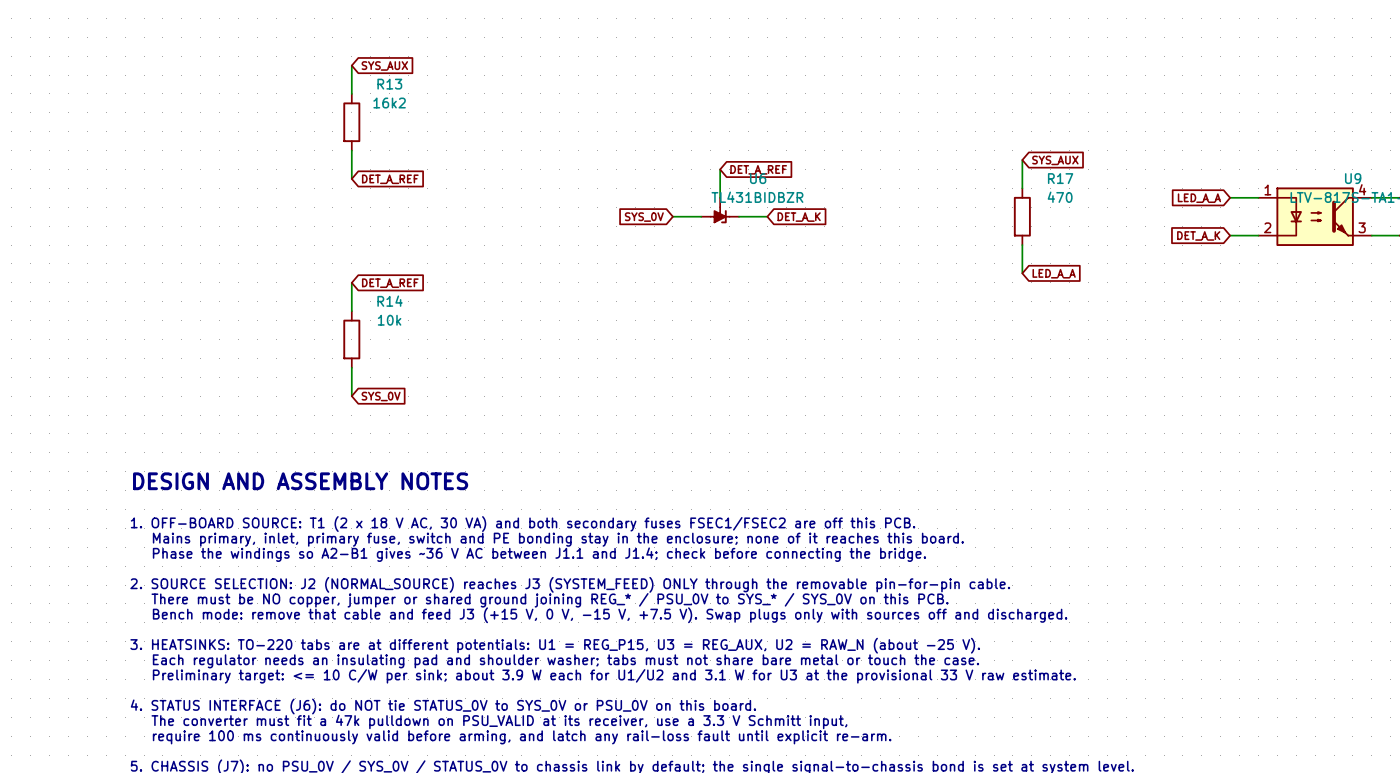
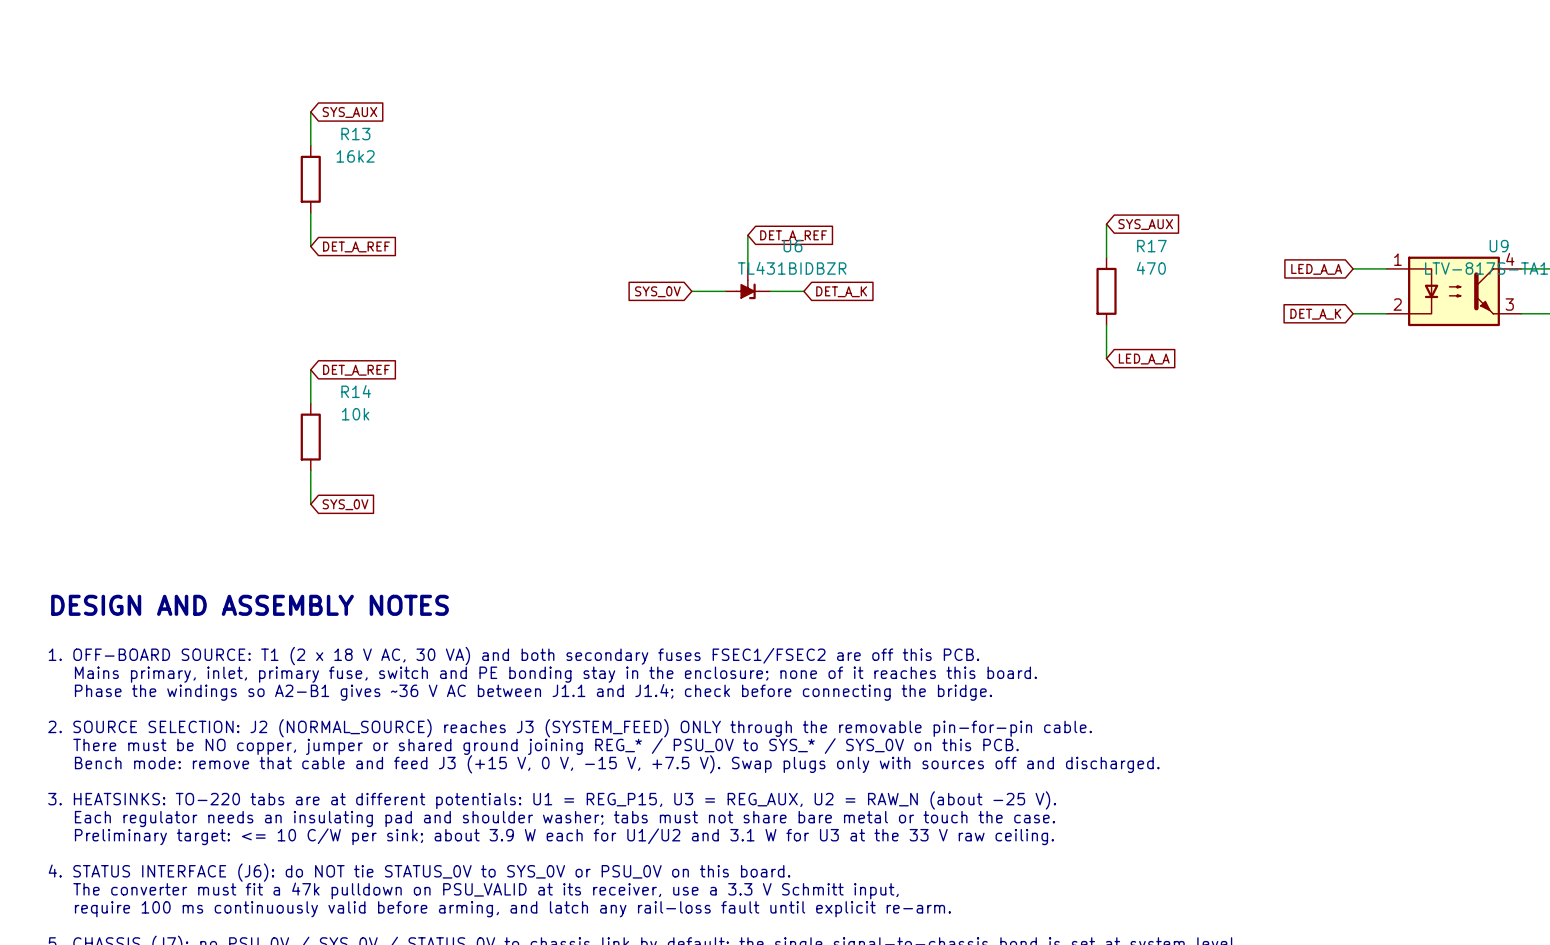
text: Preliminary target: <= 10 C/W per sink; about 3.9 W each for U1/U2 and 3.1 W for U3 at the provisional 33 V raw estimate. (614, 676) -> Preliminary target: <= 10 C/W per sink; about 3.9 W each for U1/U2 and 3.1 W for U3 at the 33 V raw ceiling. (564, 836)

